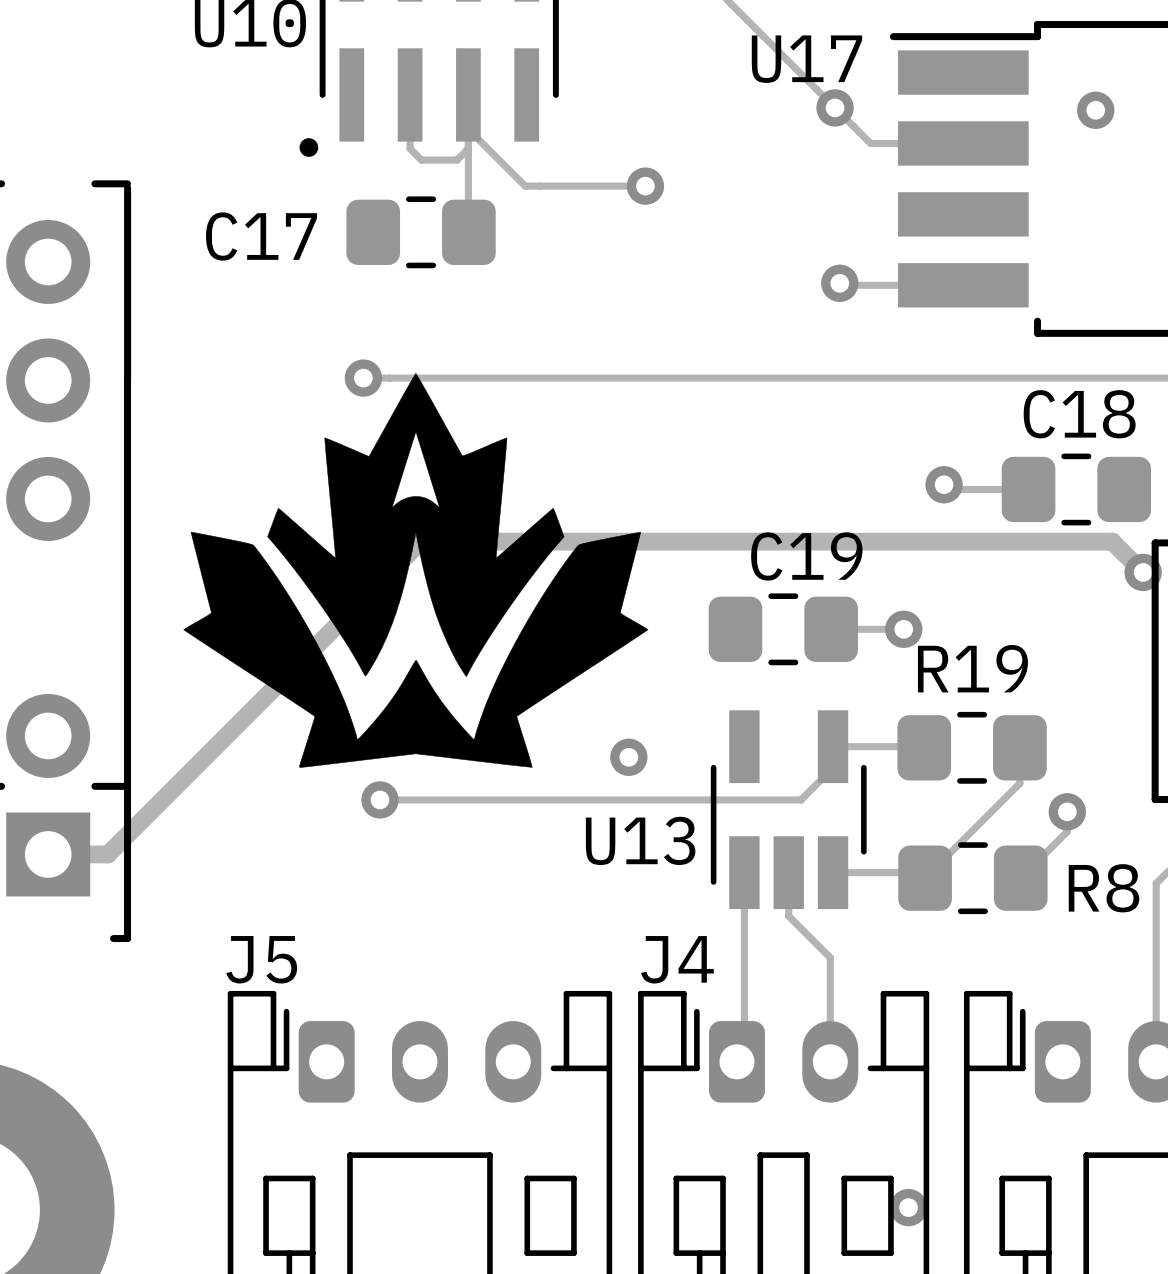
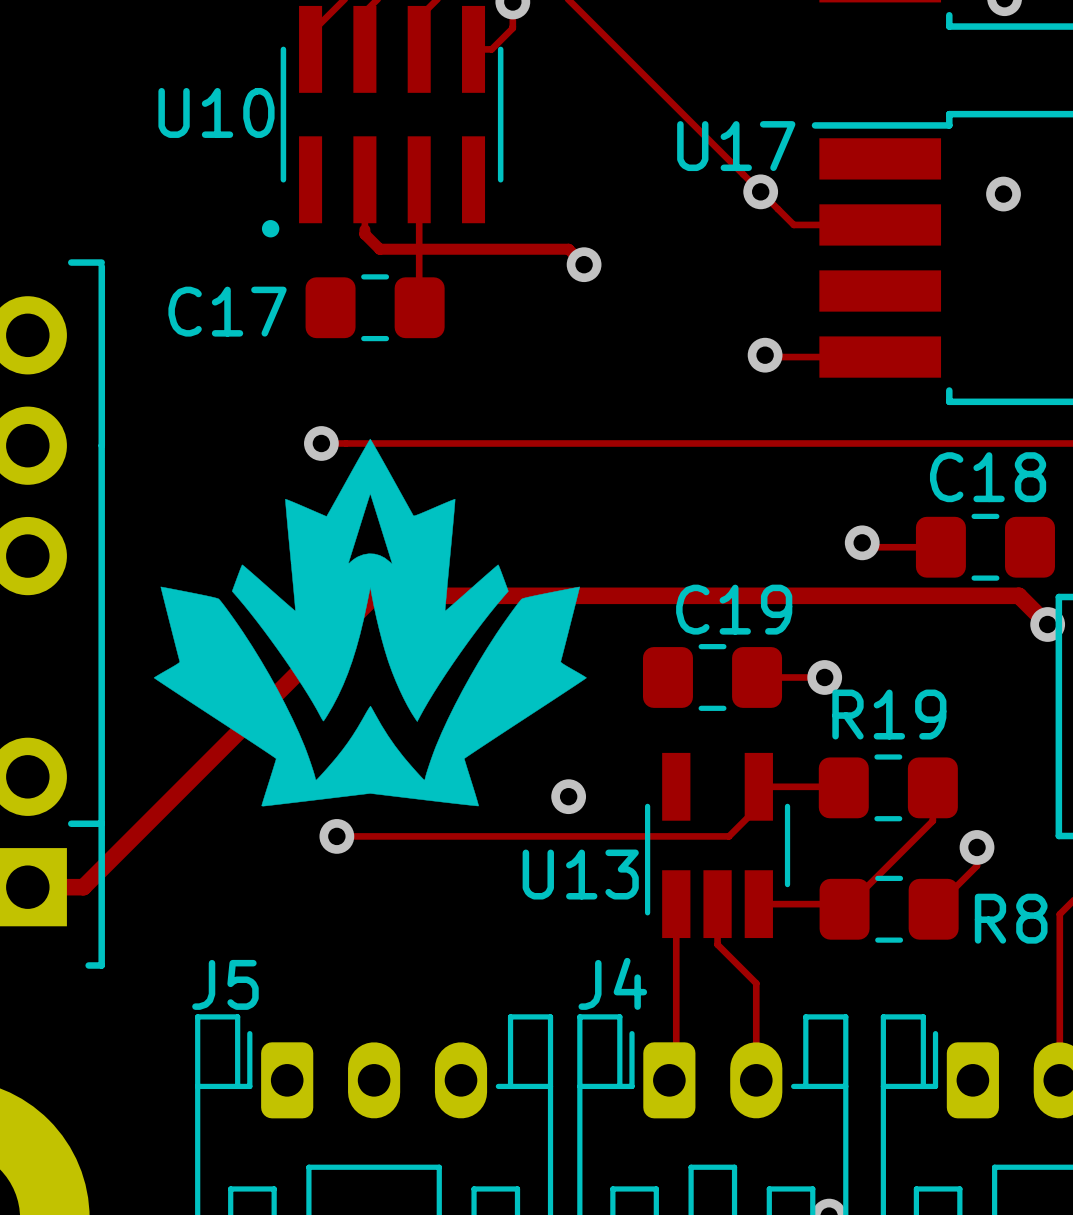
track: (468, 129) (525, 186) (645, 186) -> (364, 229) (364, 234) (379, 249) (568, 249) (584, 264)
track: (410, 148) (421, 160) (457, 160) (468, 148) -> none

